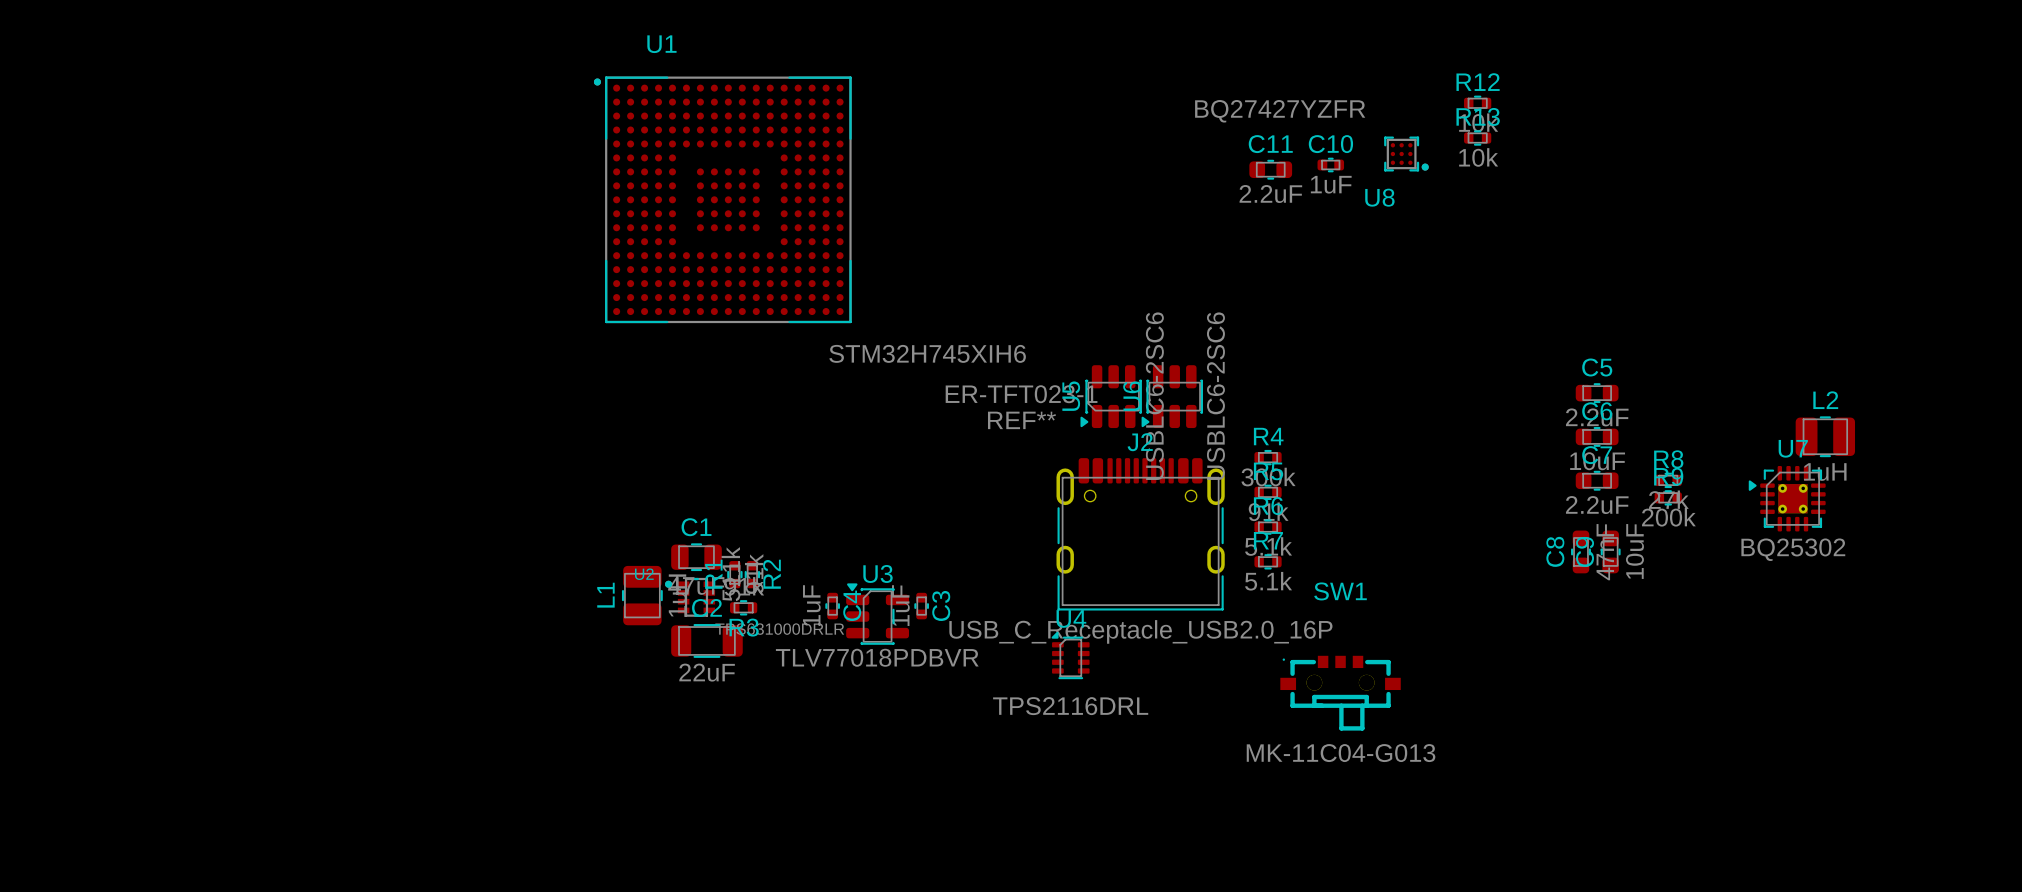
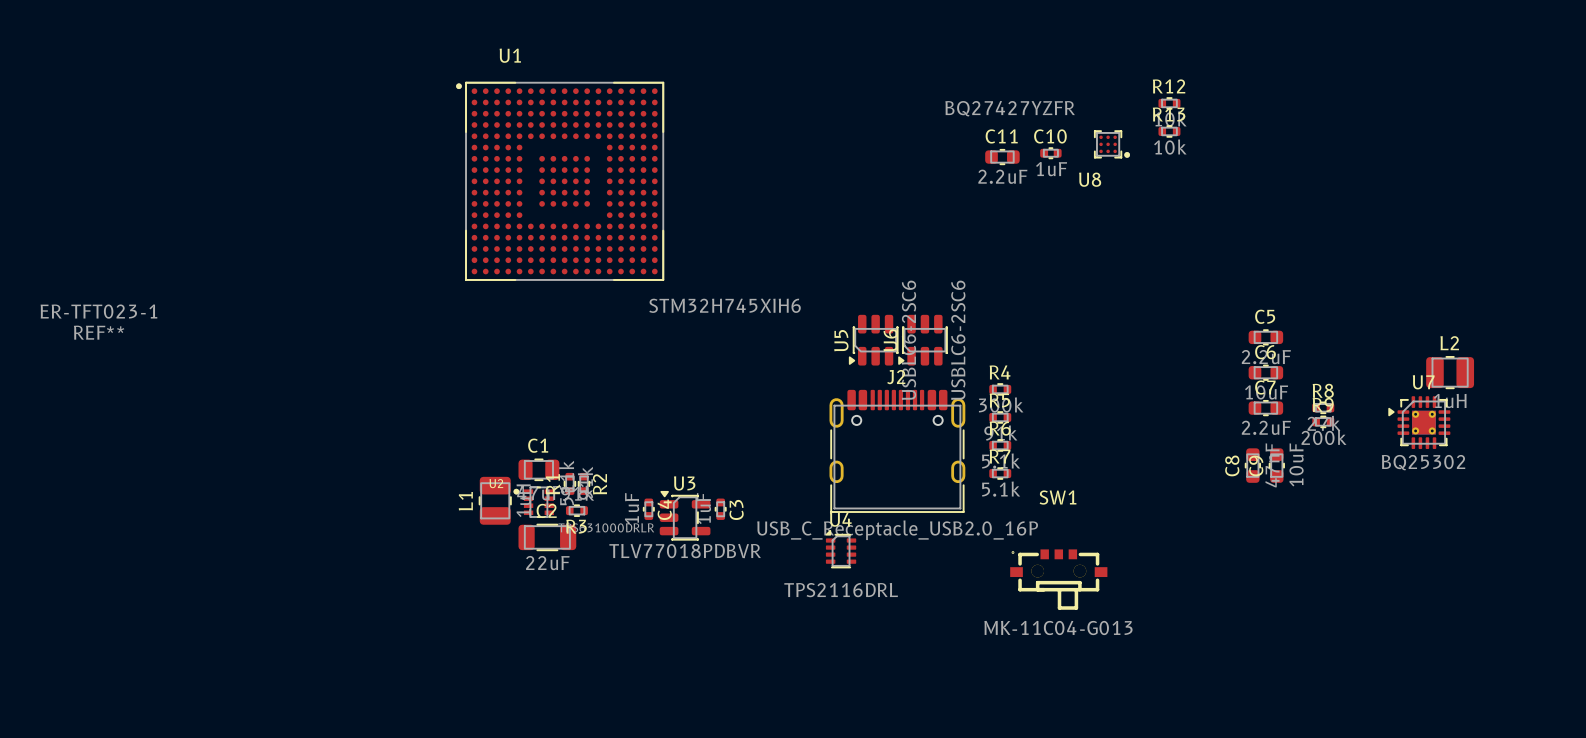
REF**: none -> ER-TFT023-1 (98, 322)
REF**: ER-TFT023-1 (1021, 407) -> none

